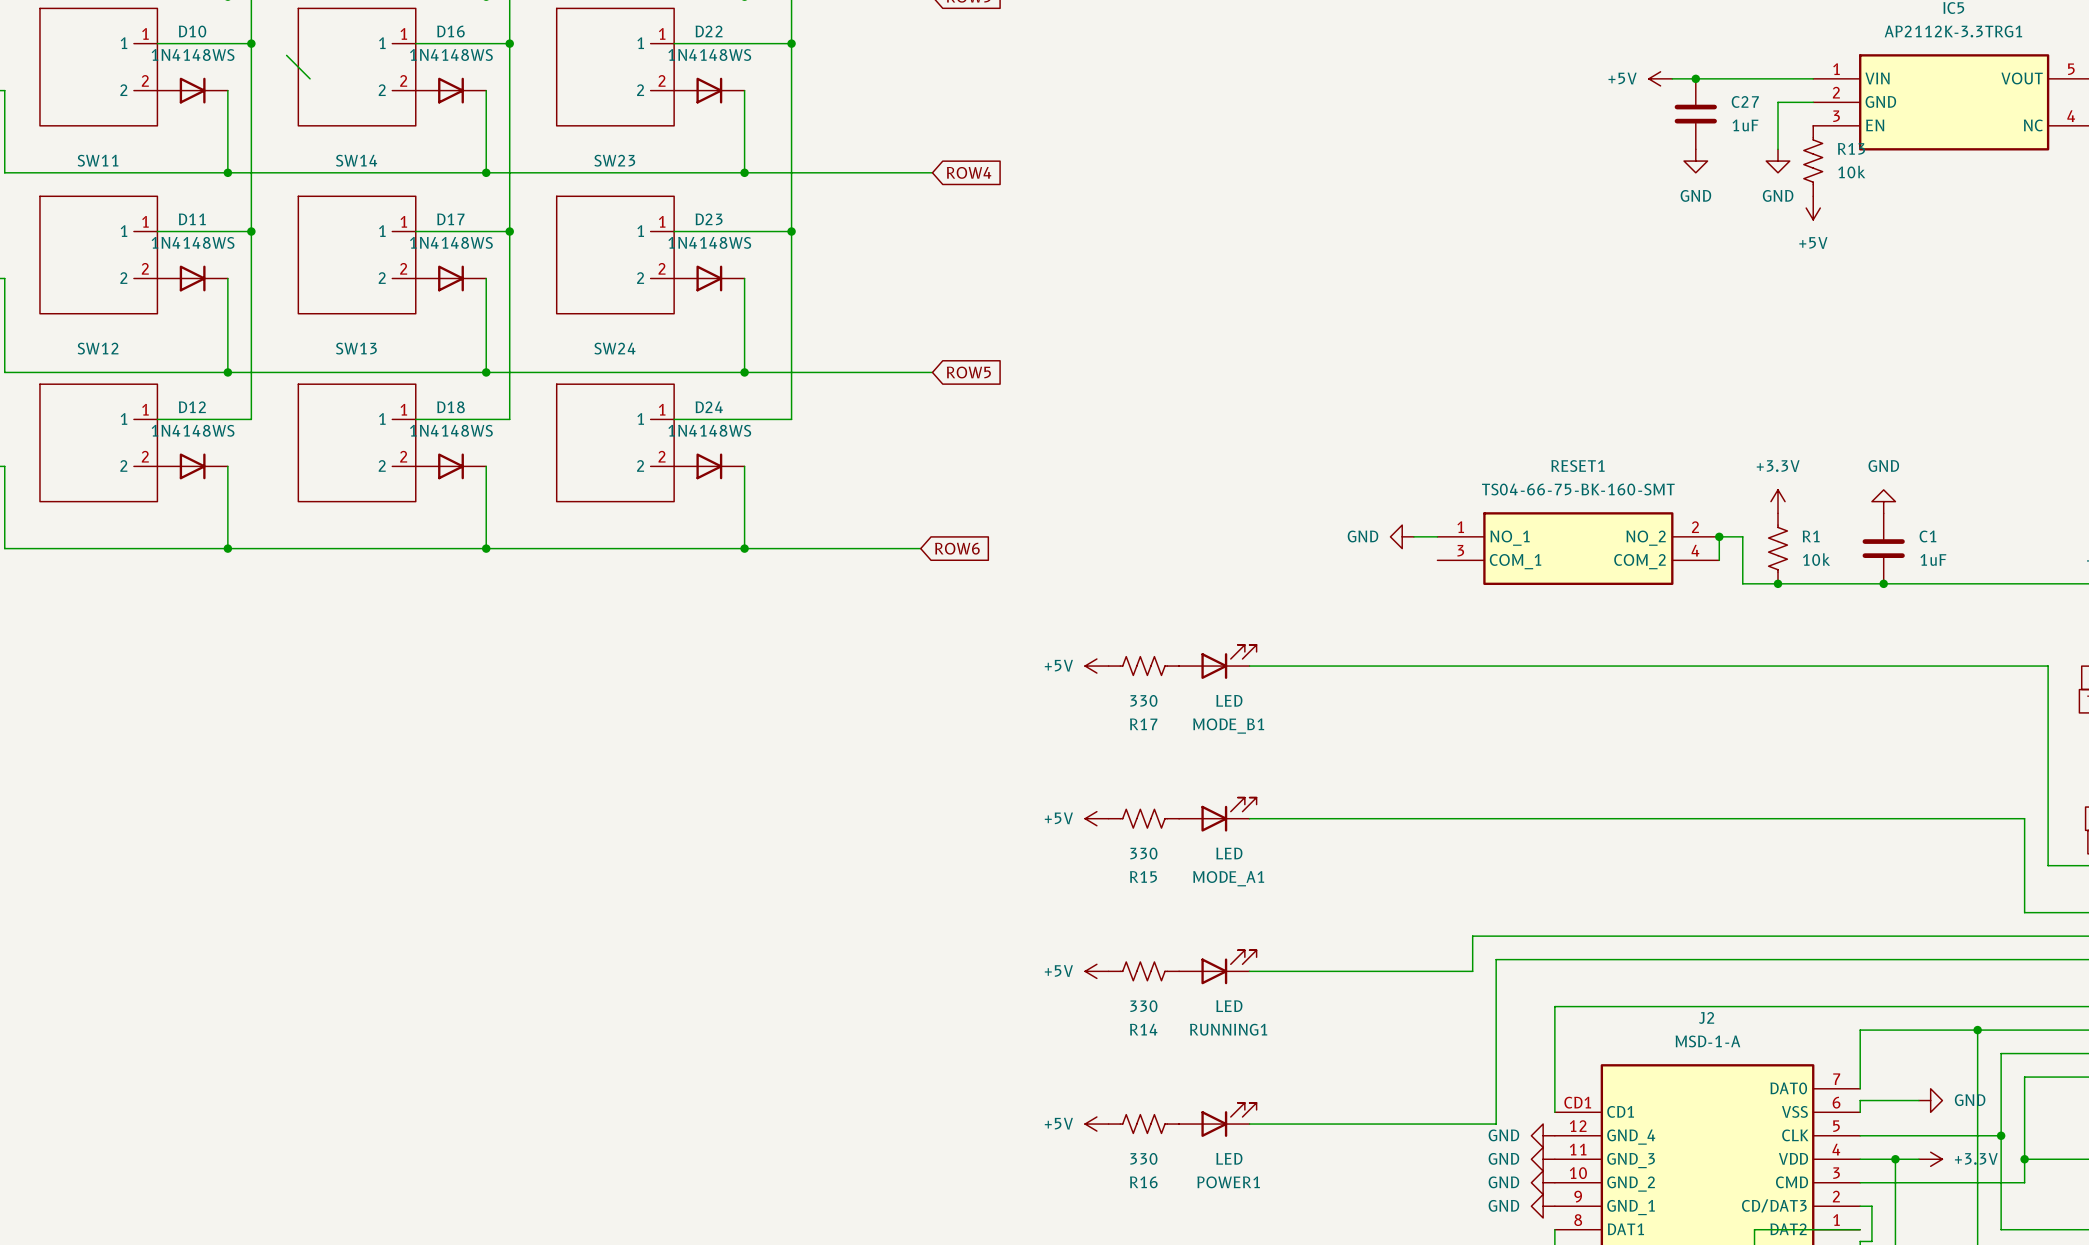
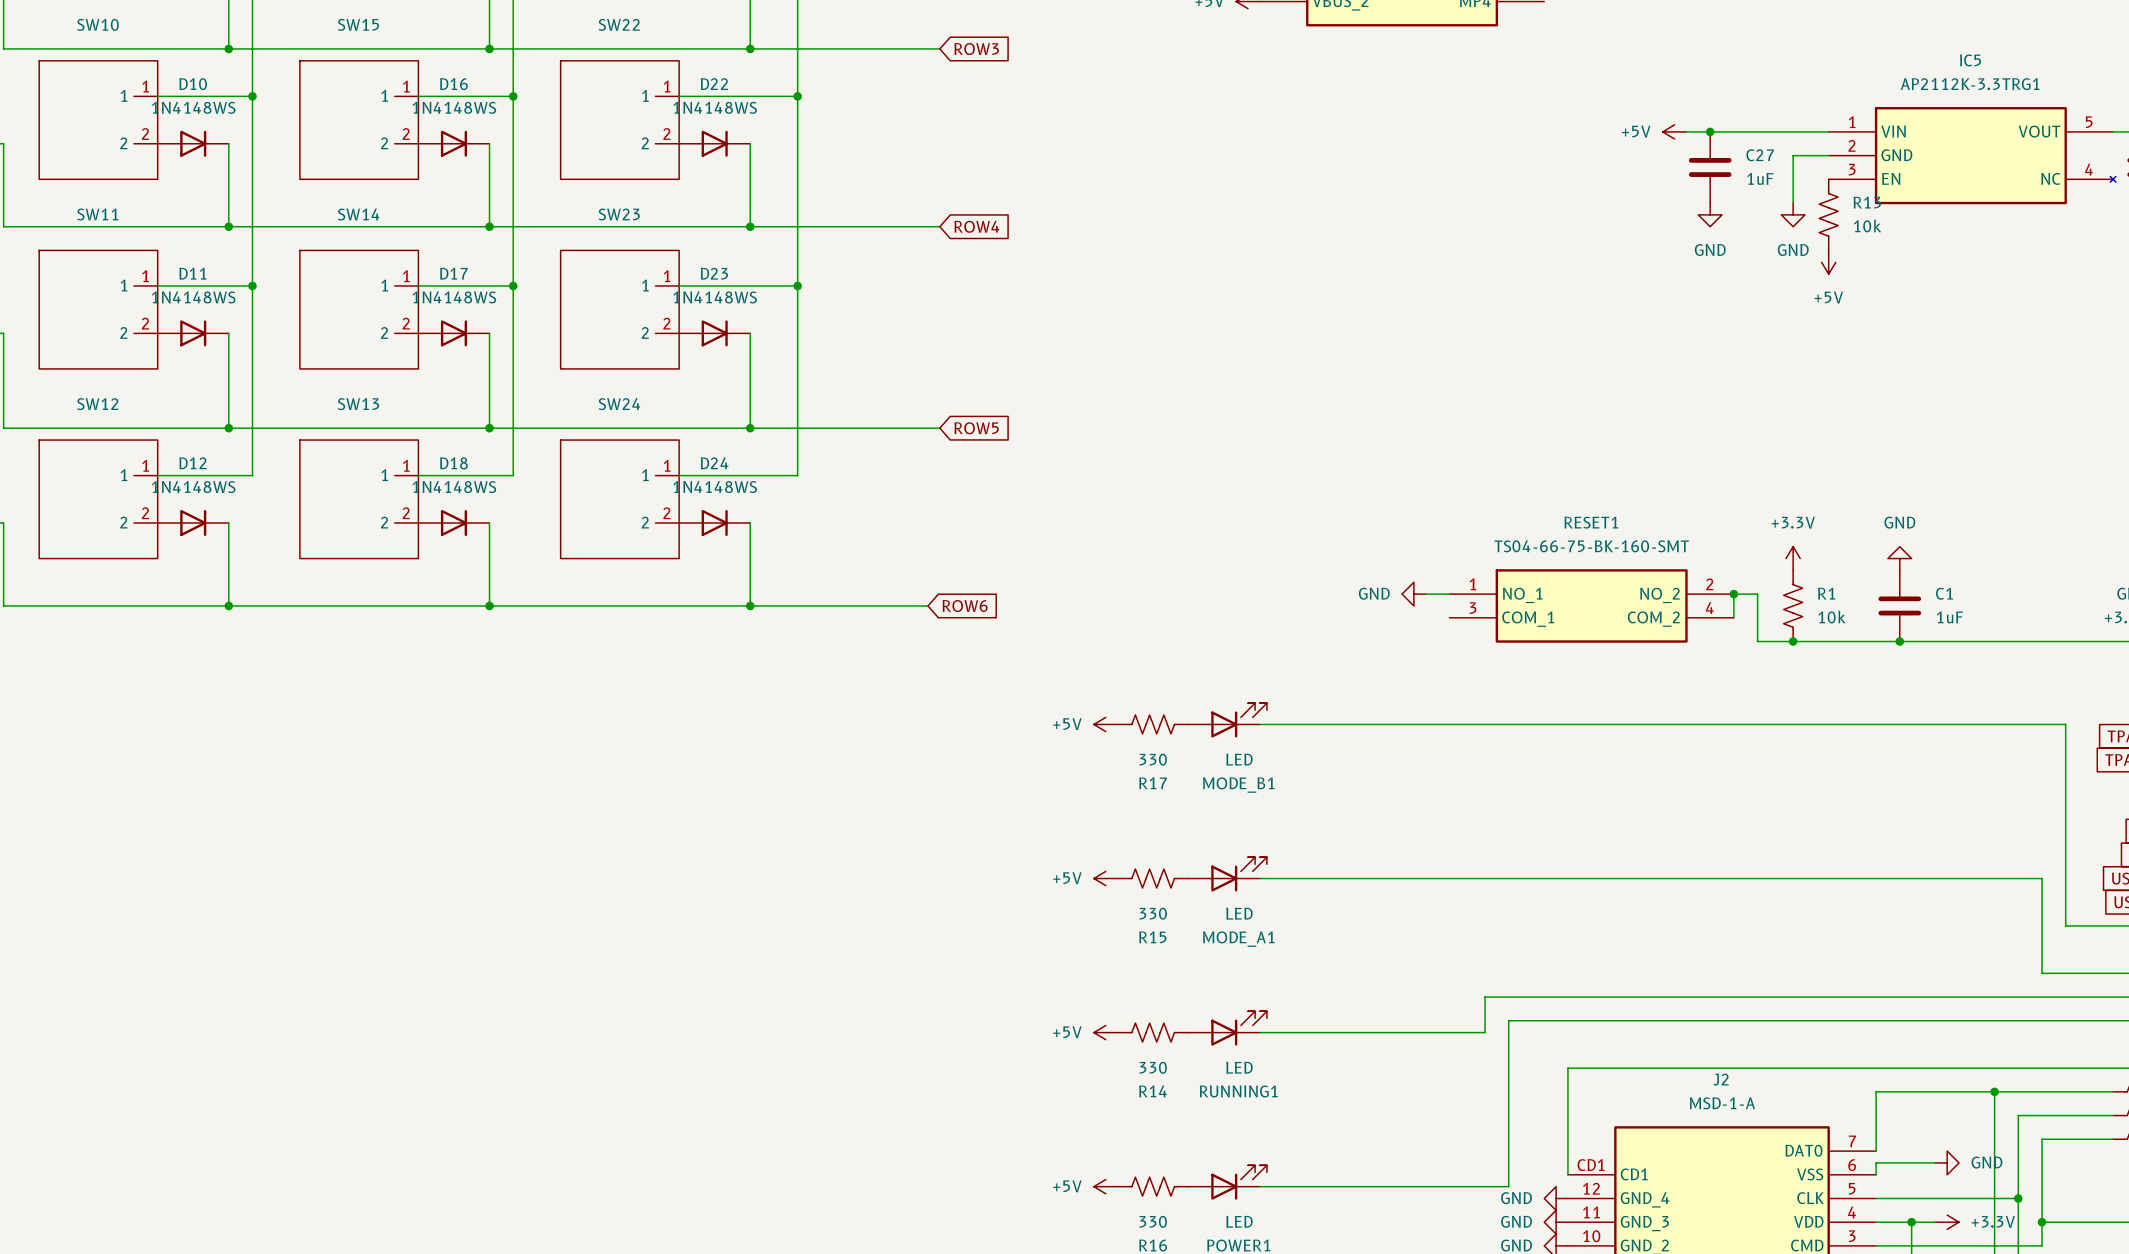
wire: (286, 55) (310, 78) -> none

